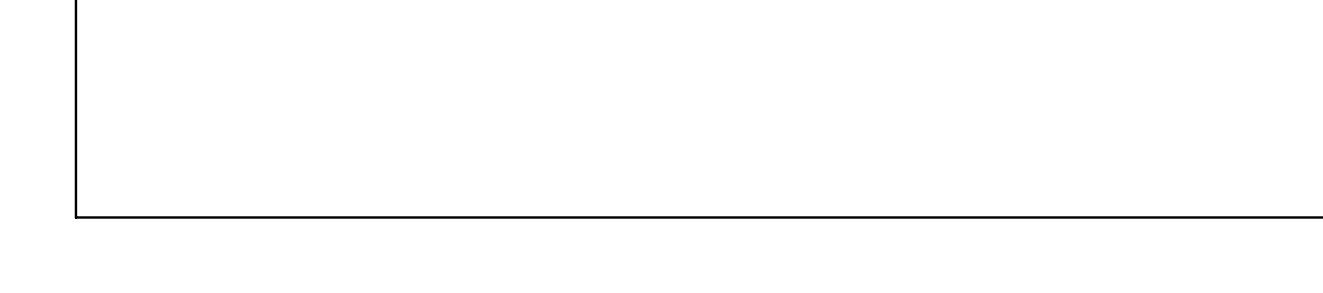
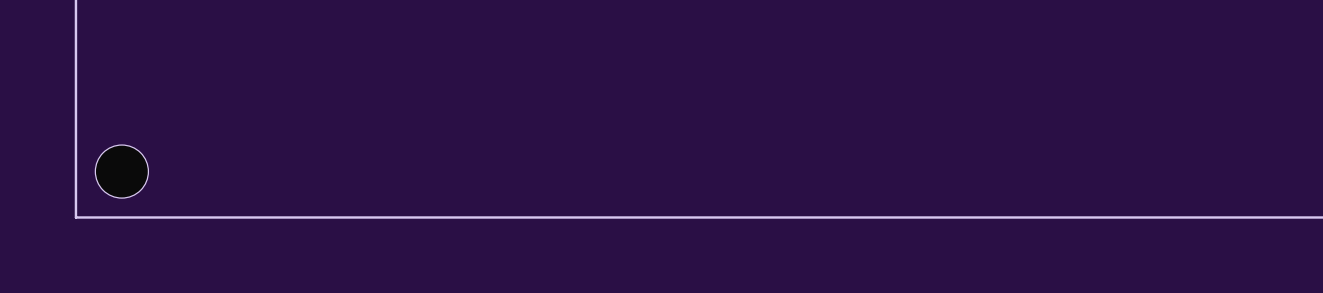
part: none -> (121, 171)

